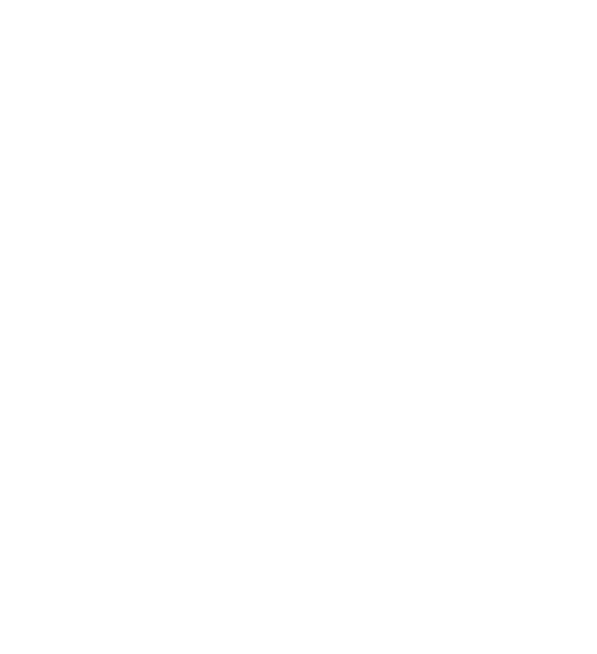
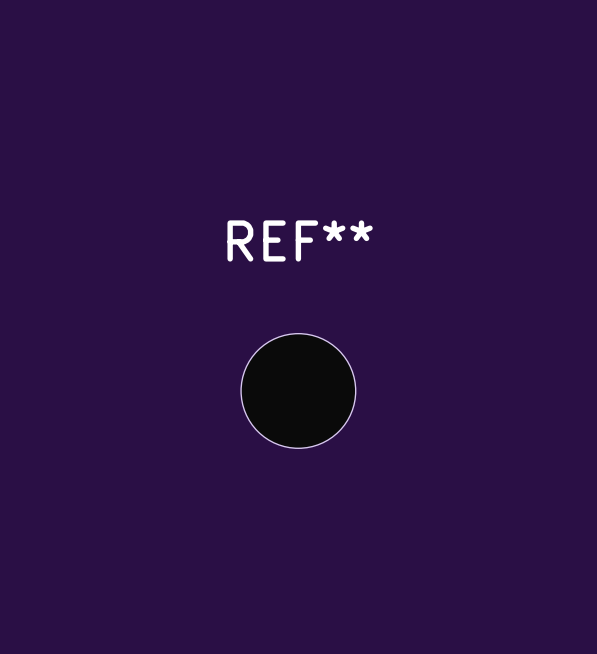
REF**: none -> (298, 390)

